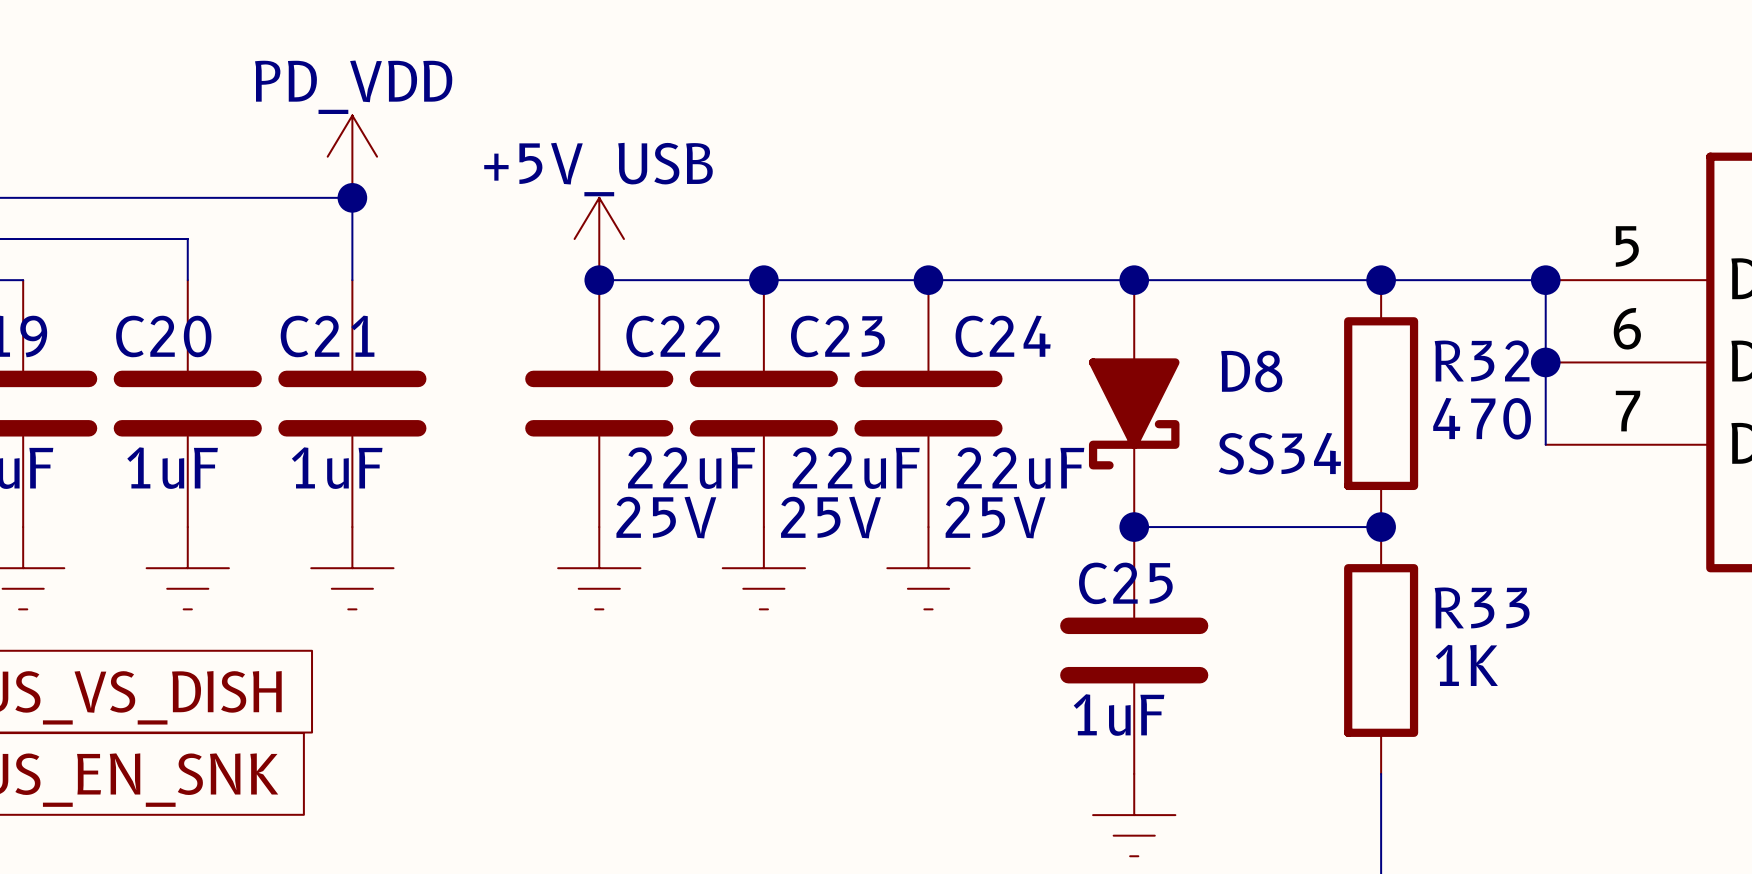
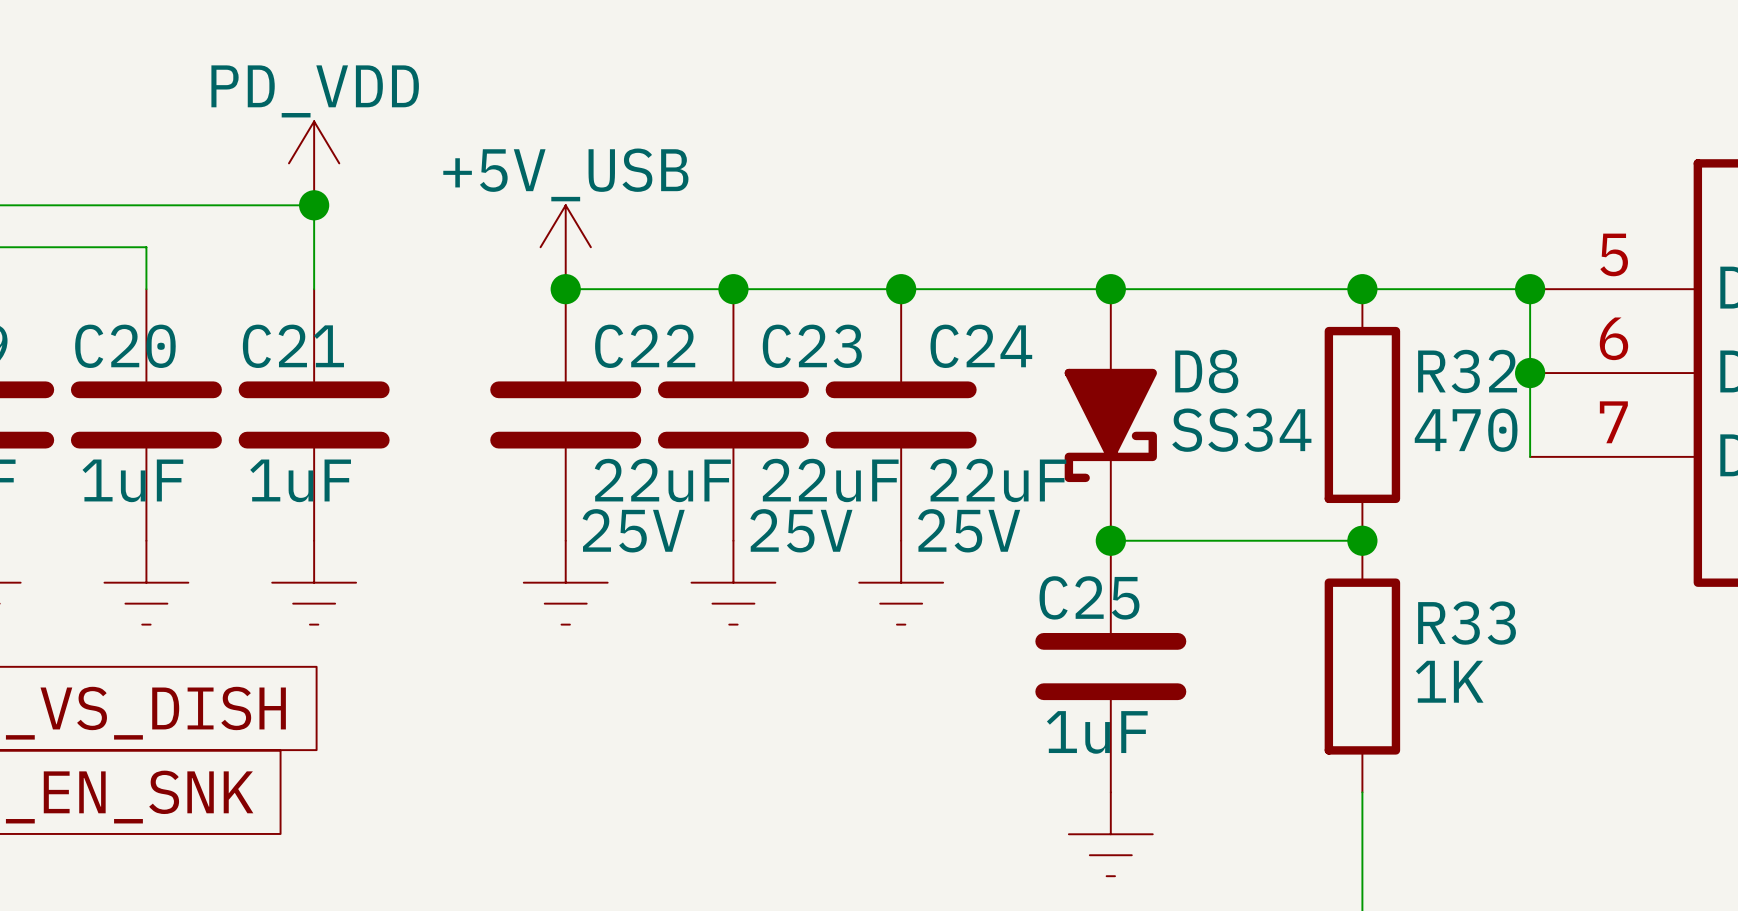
D8 name position: D8 (1251, 371) -> D8 (1206, 371)
D8 value position: SS34 (1279, 453) -> SS34 (1241, 430)
C25 name position: C25 (1125, 583) -> C25 (1089, 597)

